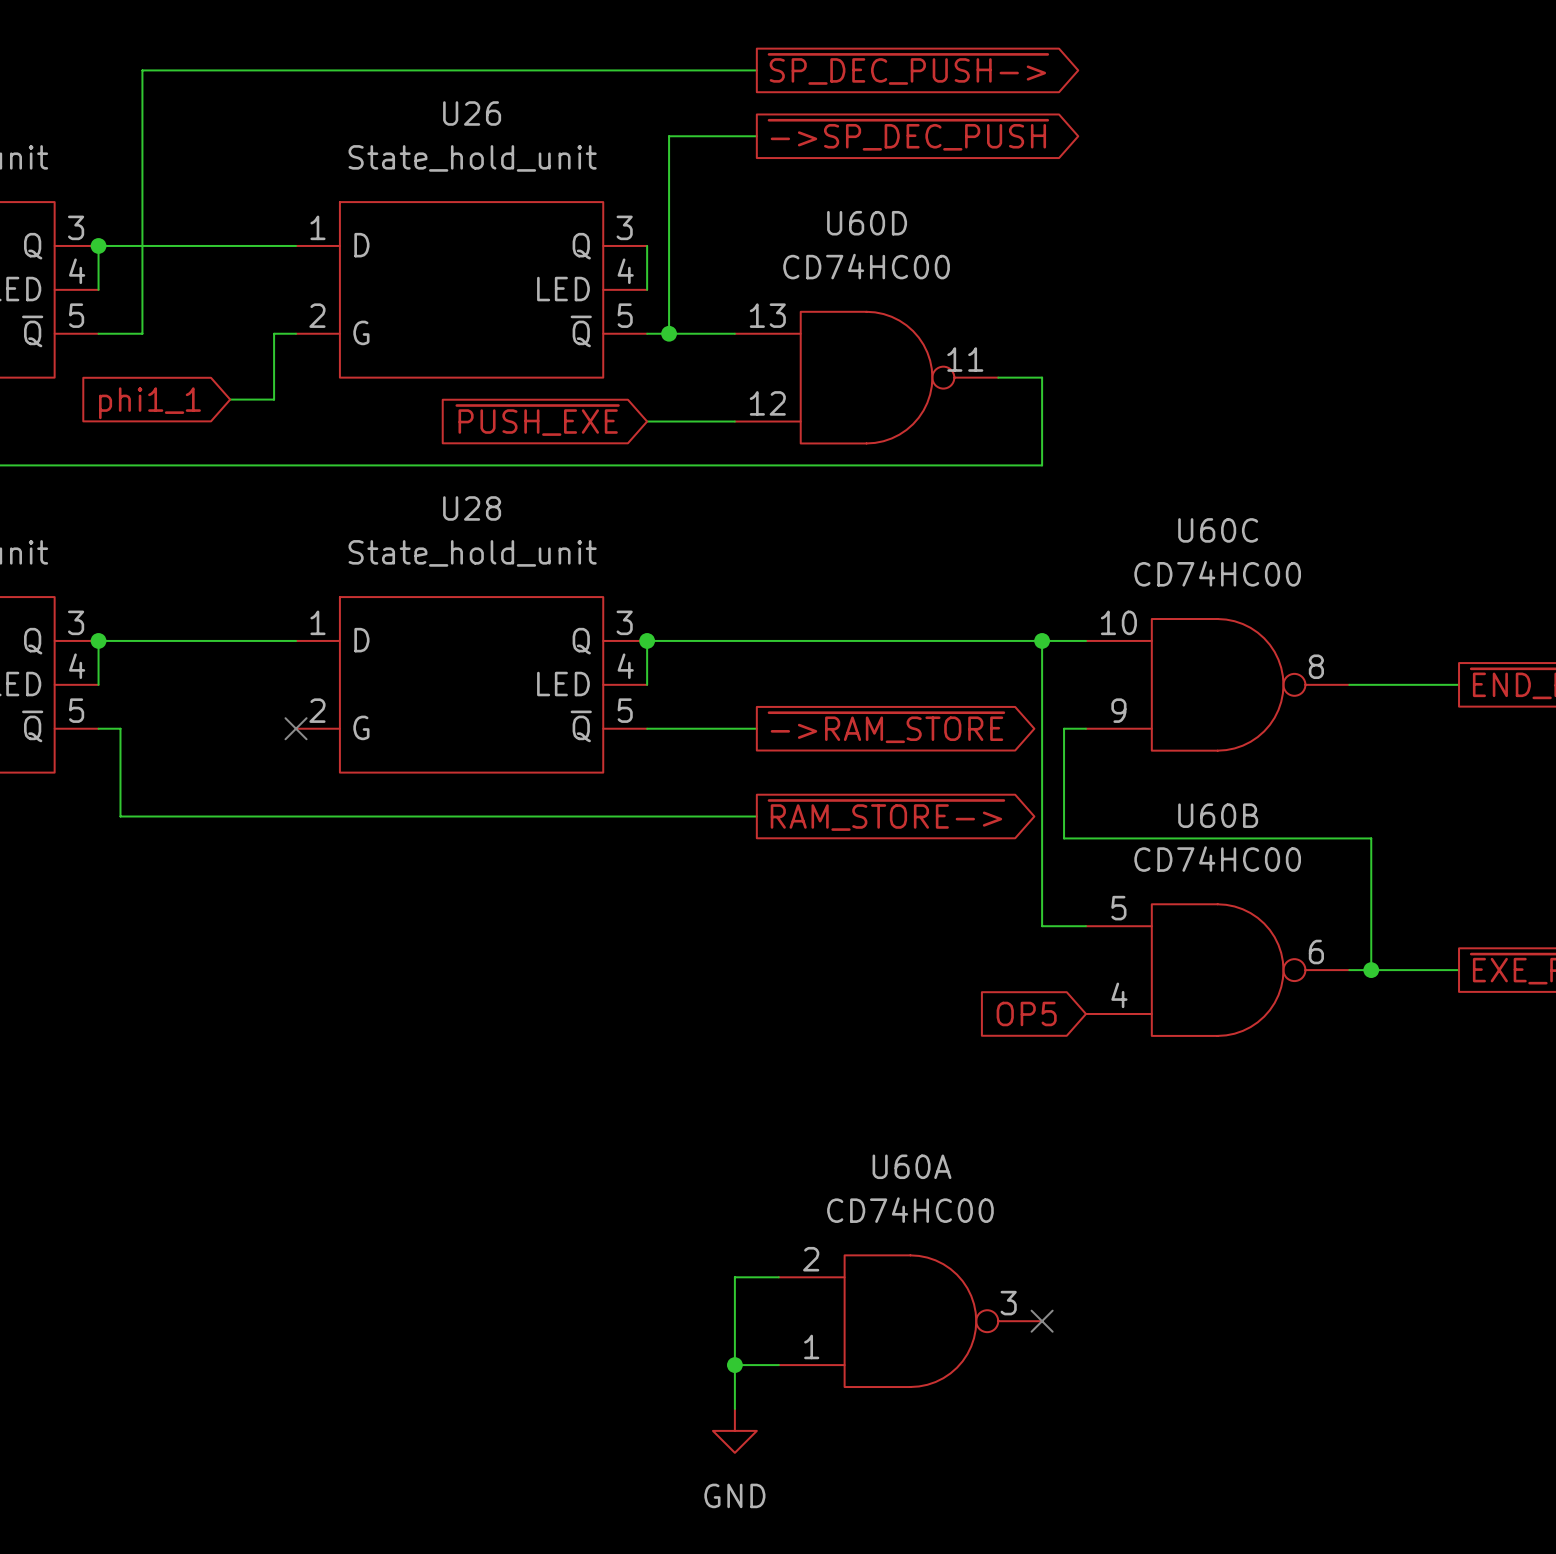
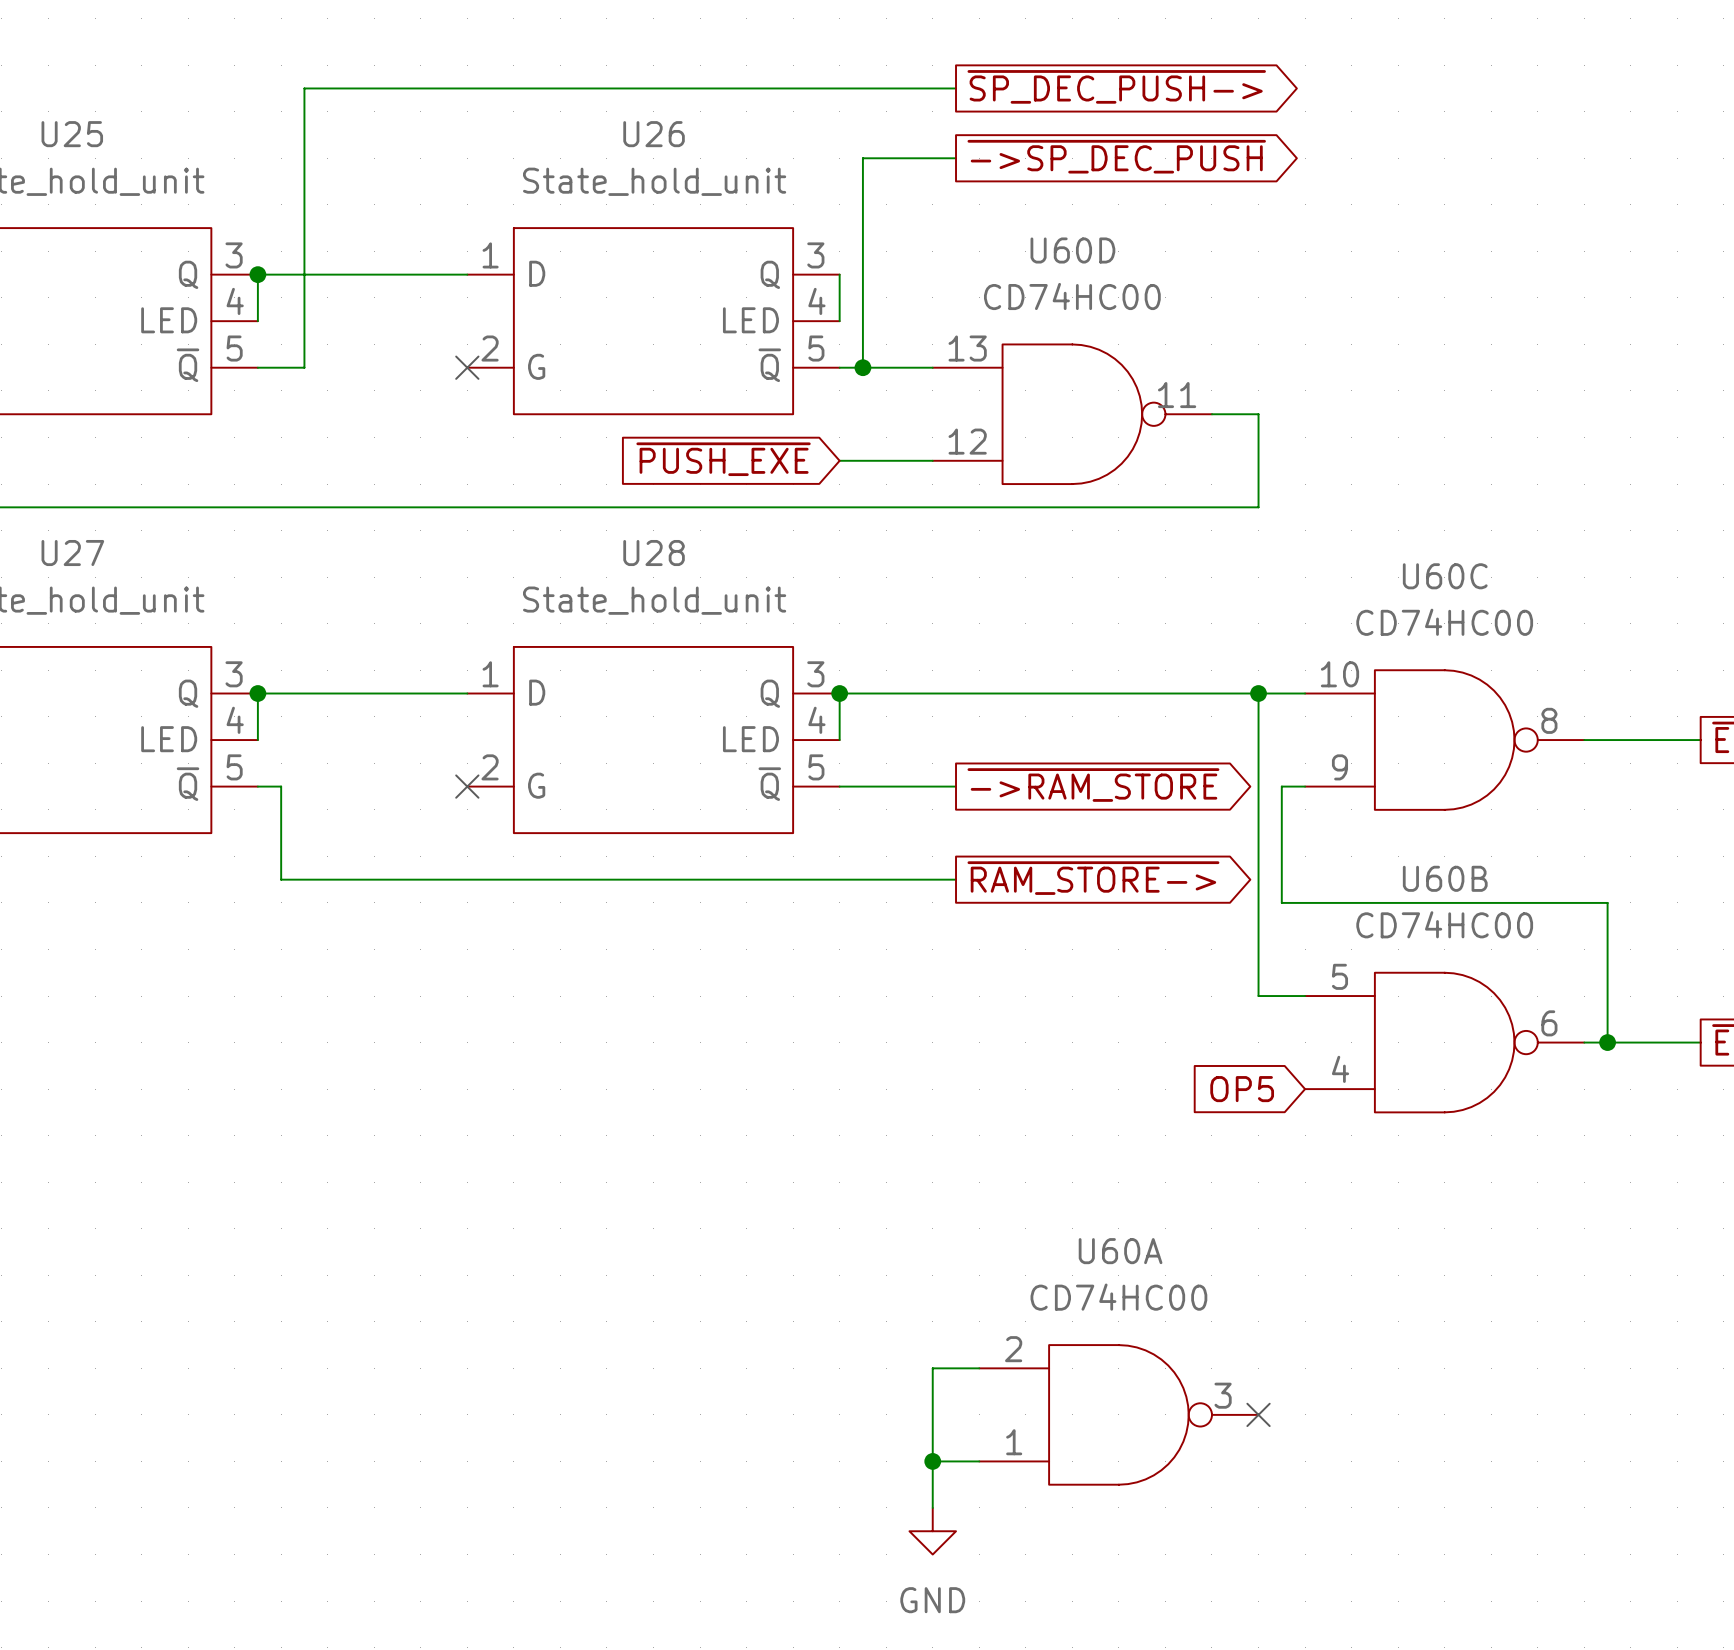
wire: (296, 333) (274, 333) (274, 399) (230, 399) -> none
no-connect mark: none -> (467, 367)
global label: phi1_1 (149, 403) -> none

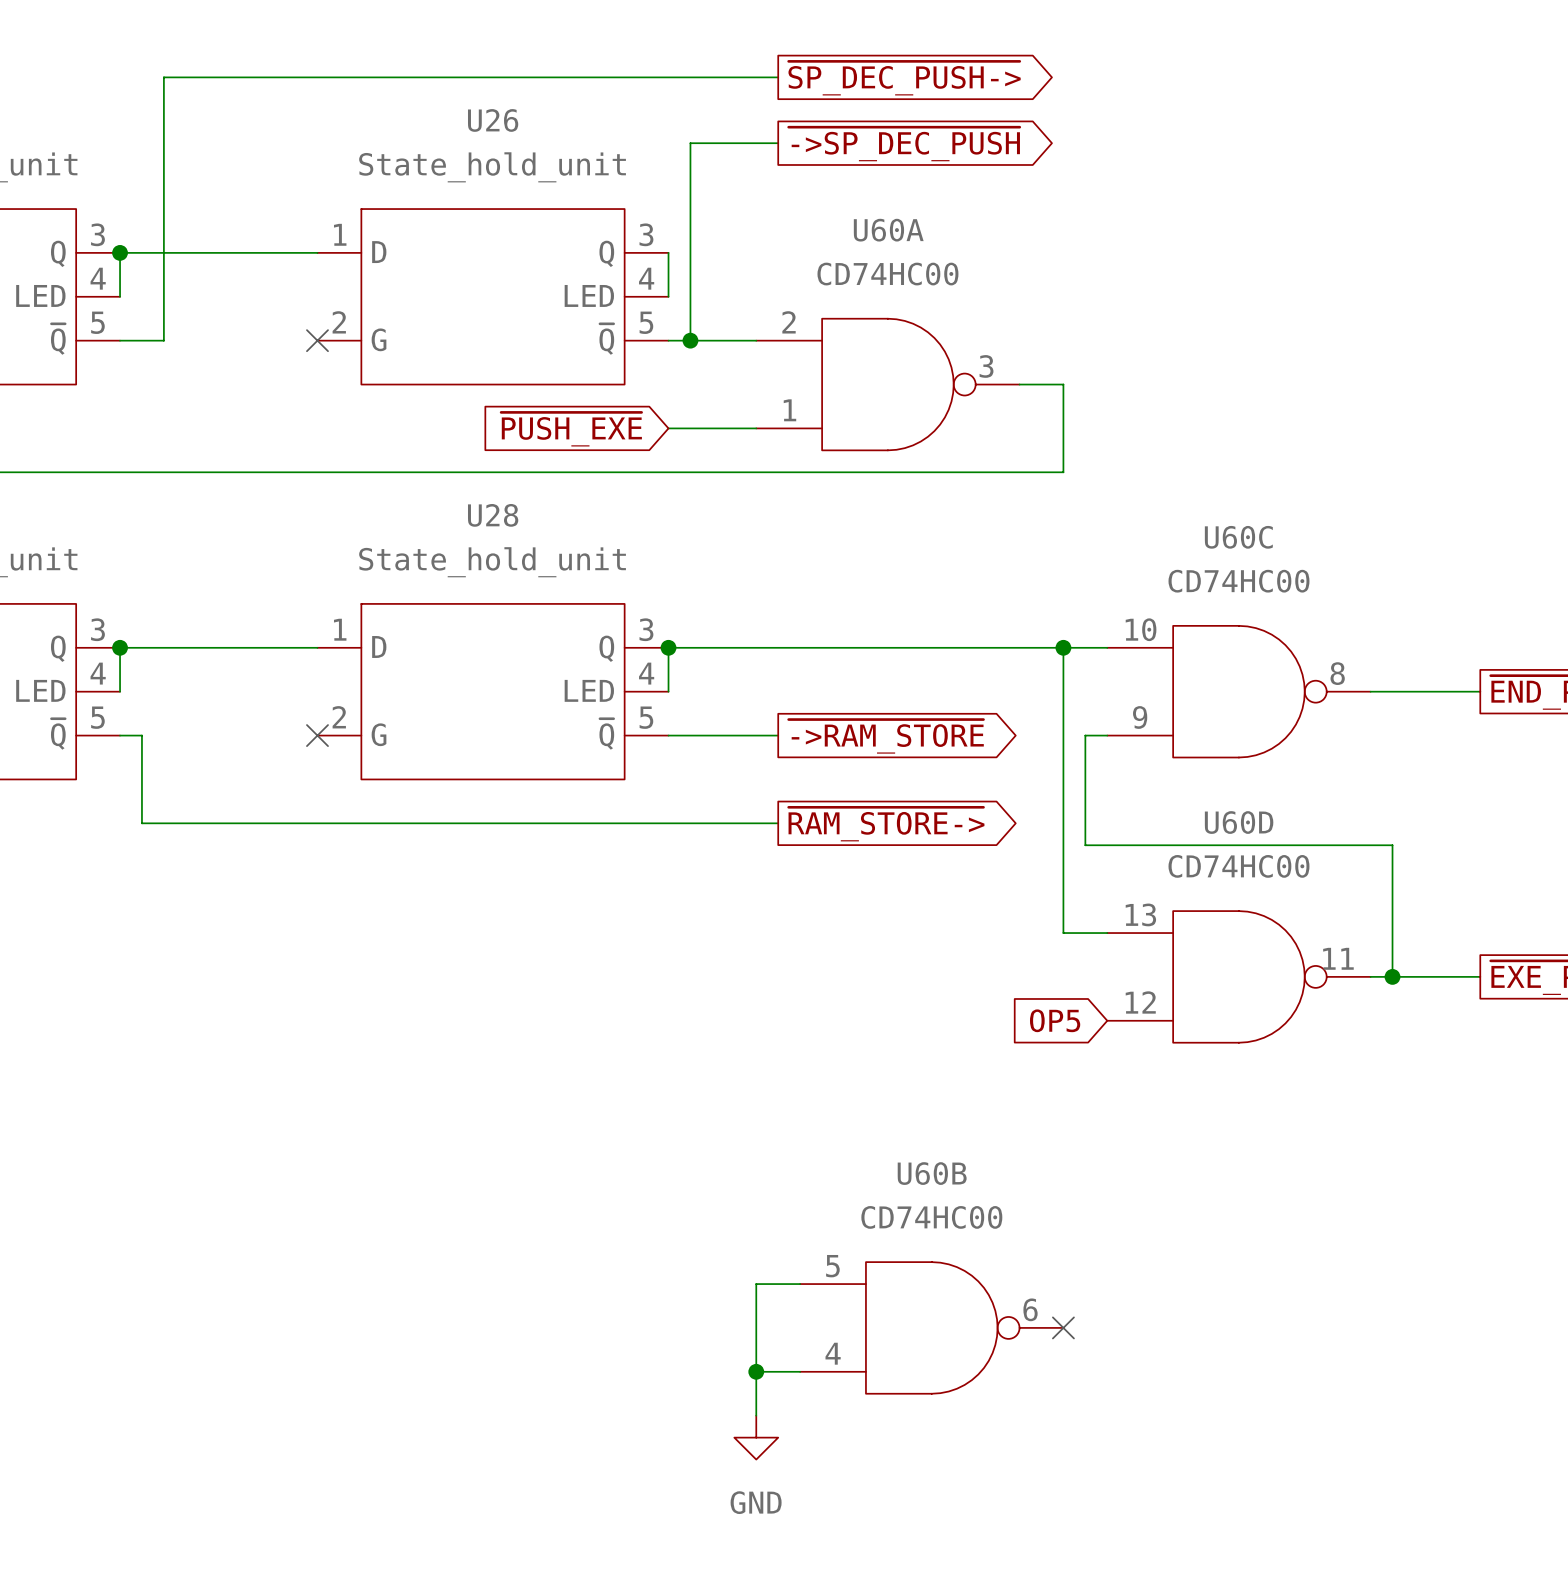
U60D position: (1072, 414) -> (1238, 976)
U60B position: (1444, 1042) -> (931, 1327)
U60A position: (1118, 1414) -> (887, 384)

